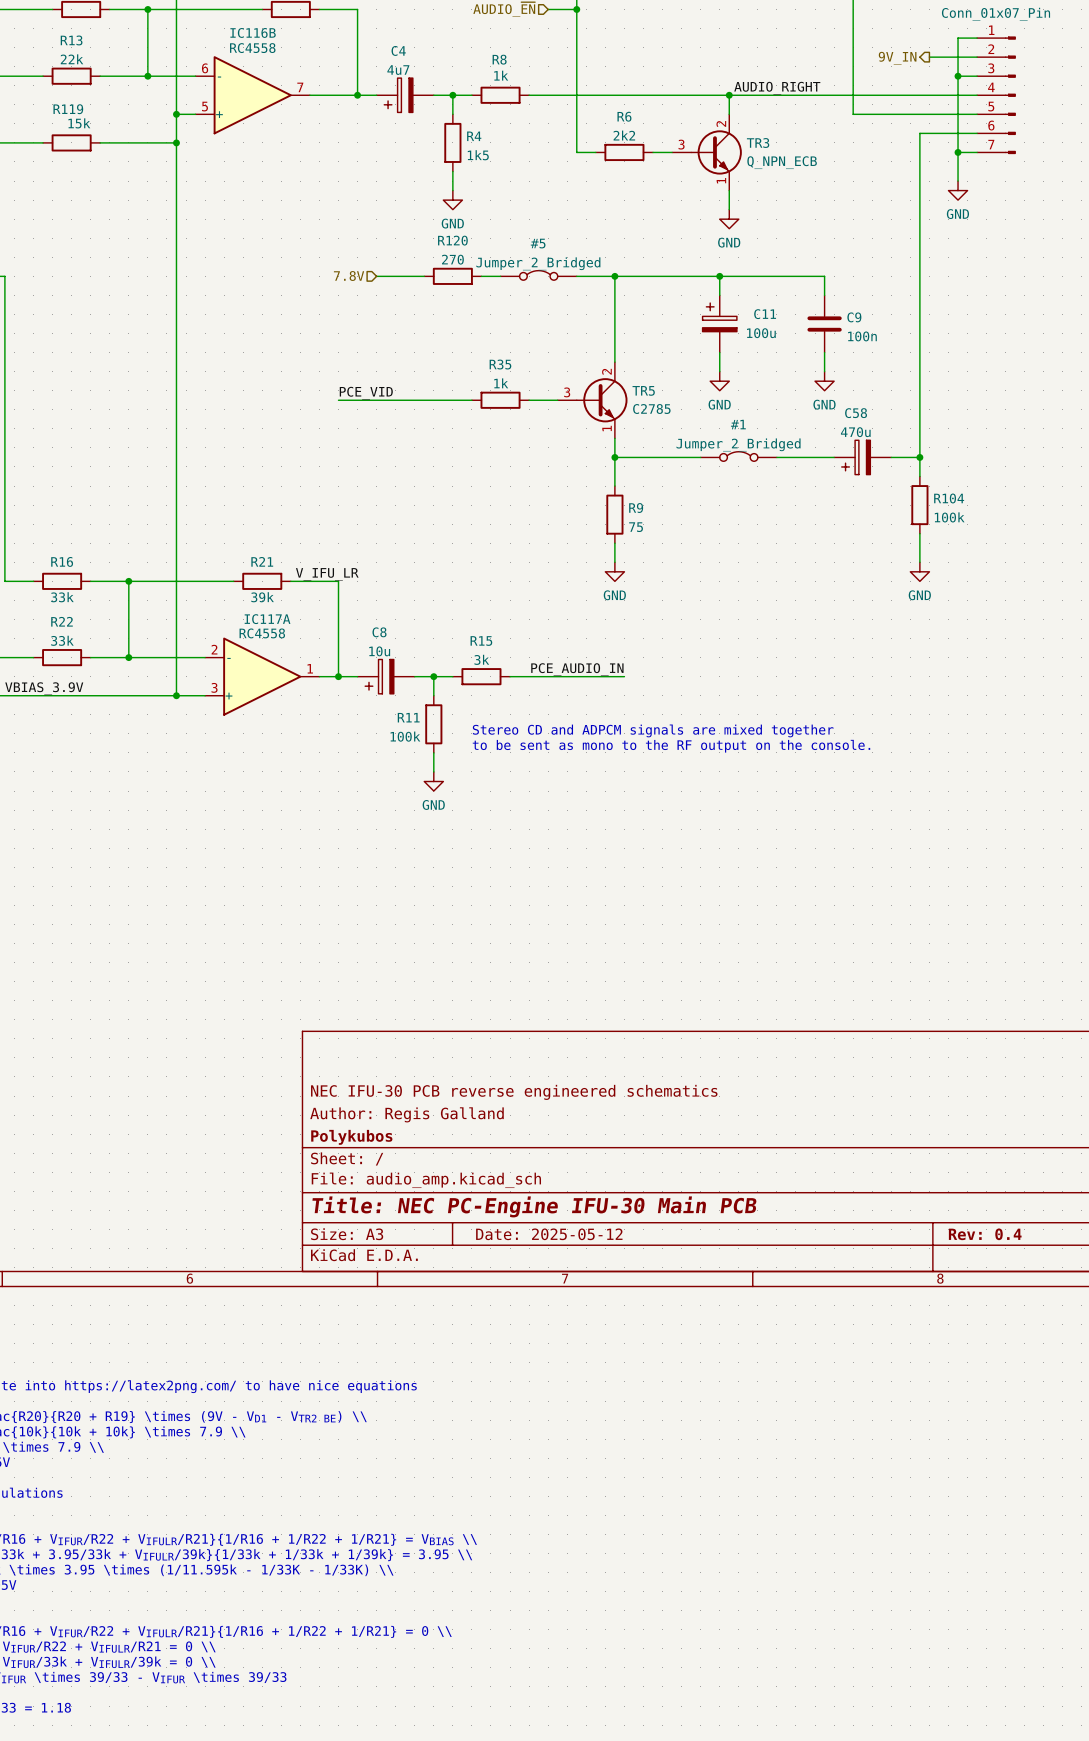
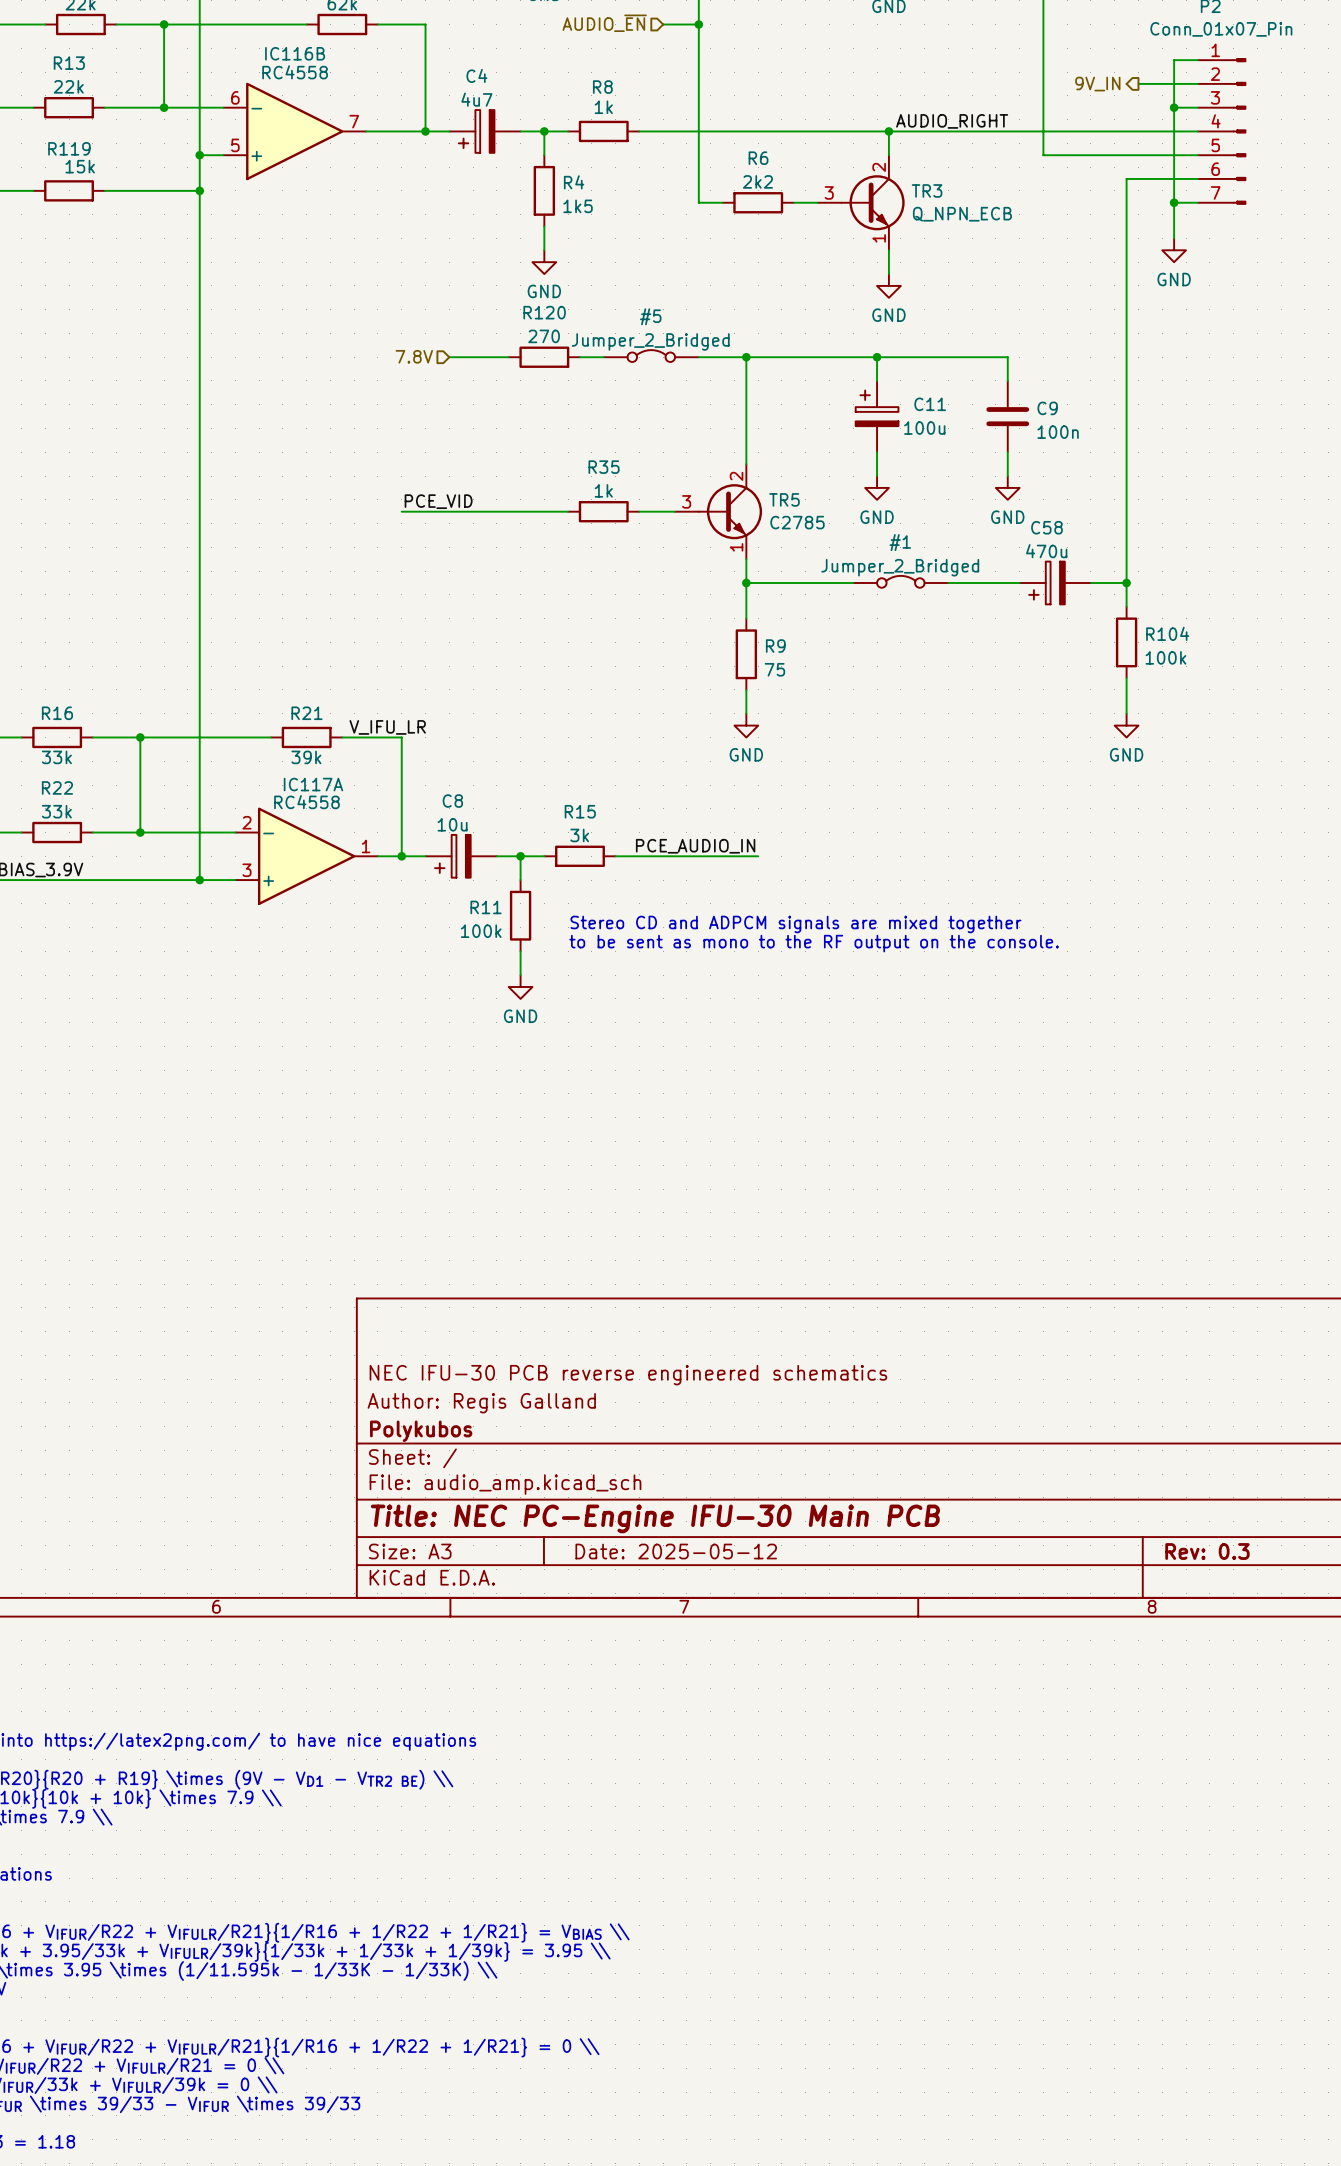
title block: Rev: 0.4 (985, 1234) -> Rev: 0.3 (1207, 1551)

